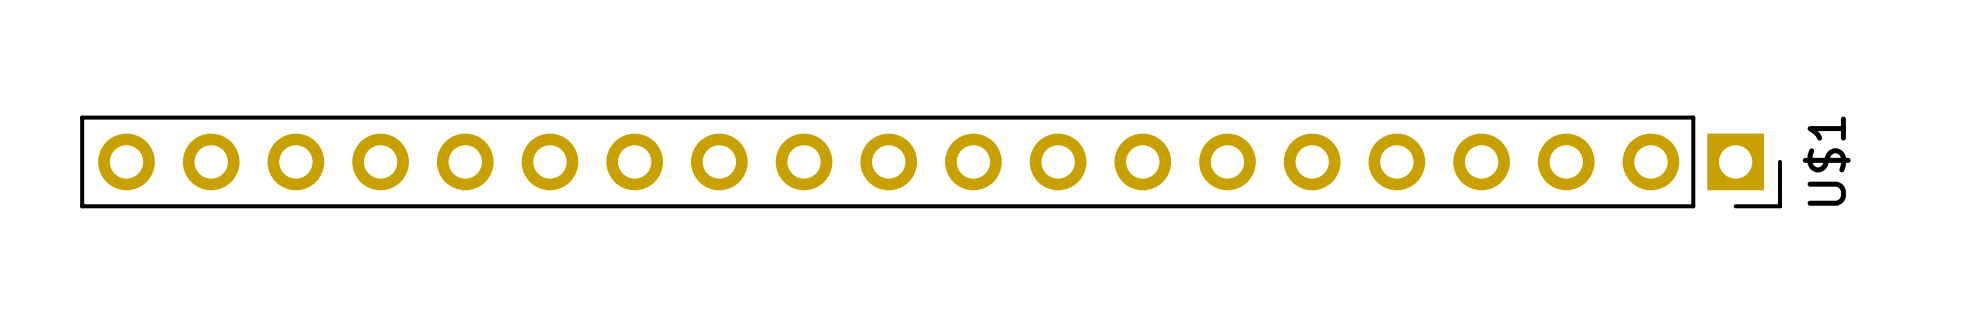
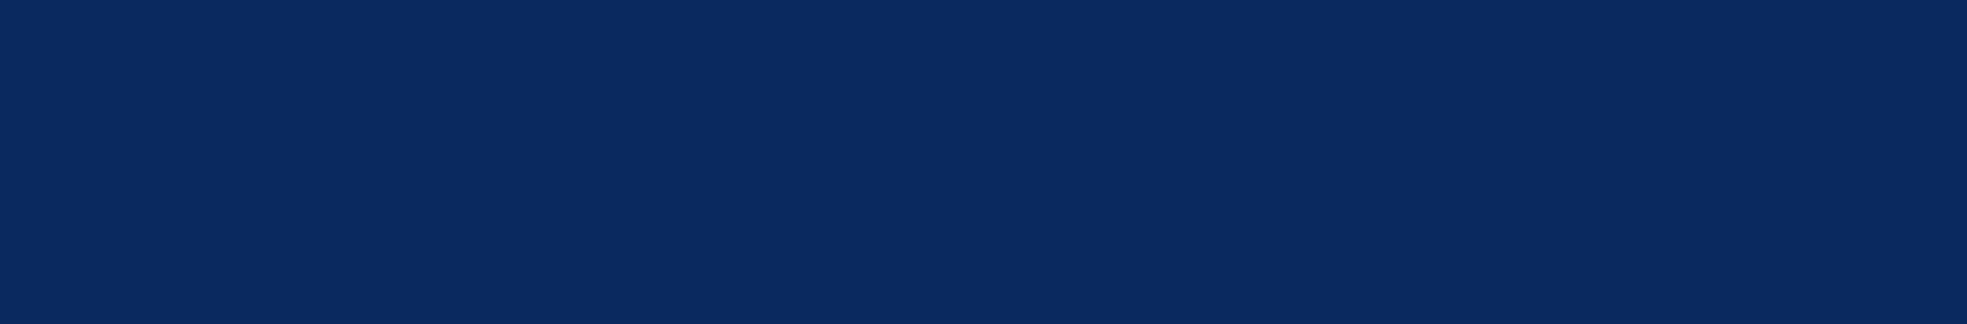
U$1: (931, 161) -> none

